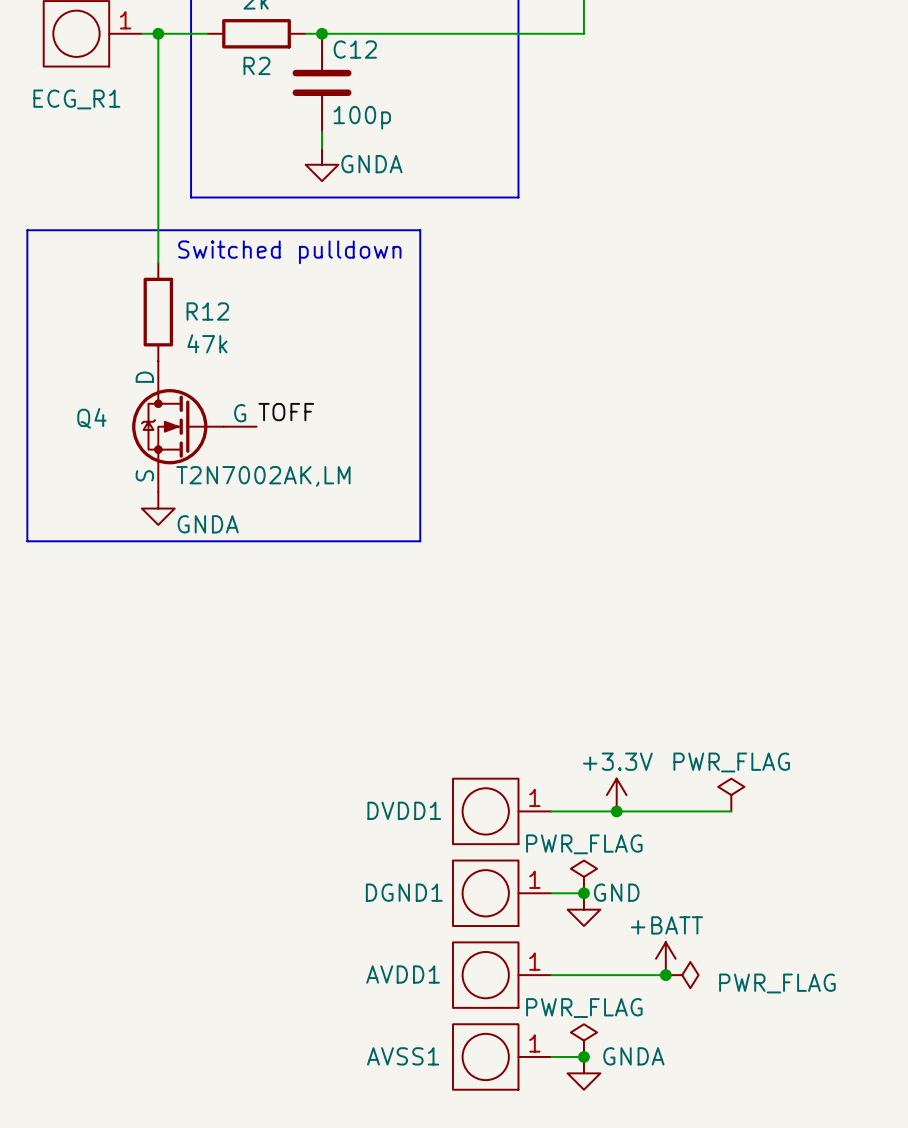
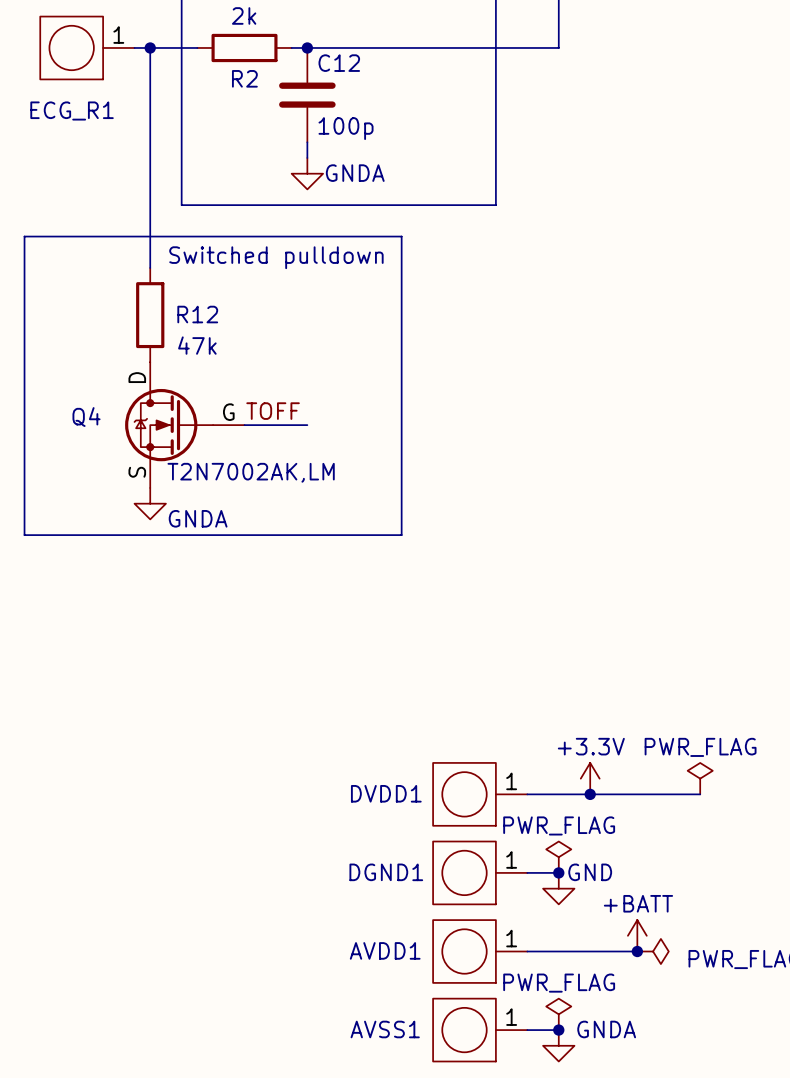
wire: none -> (244, 425) (307, 425)

